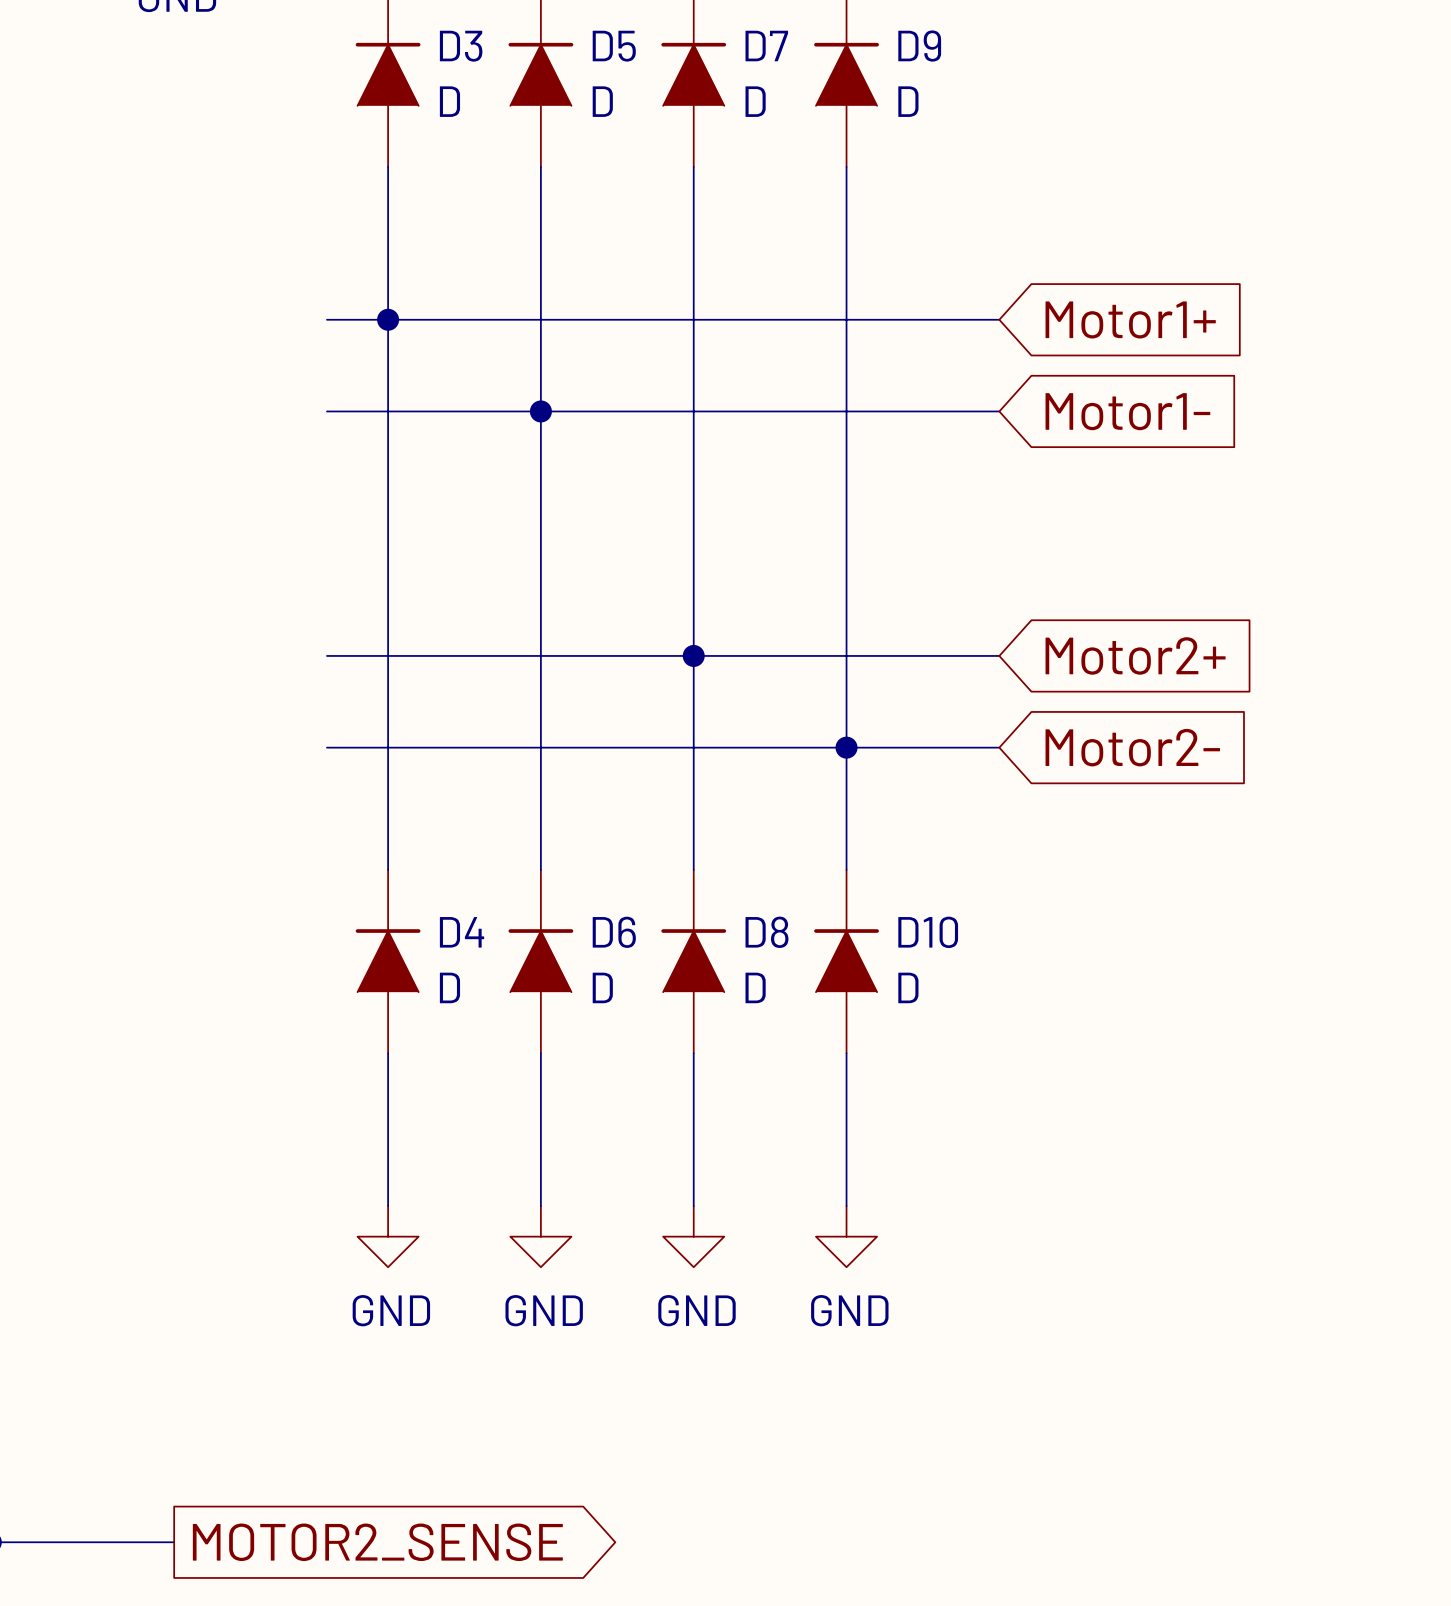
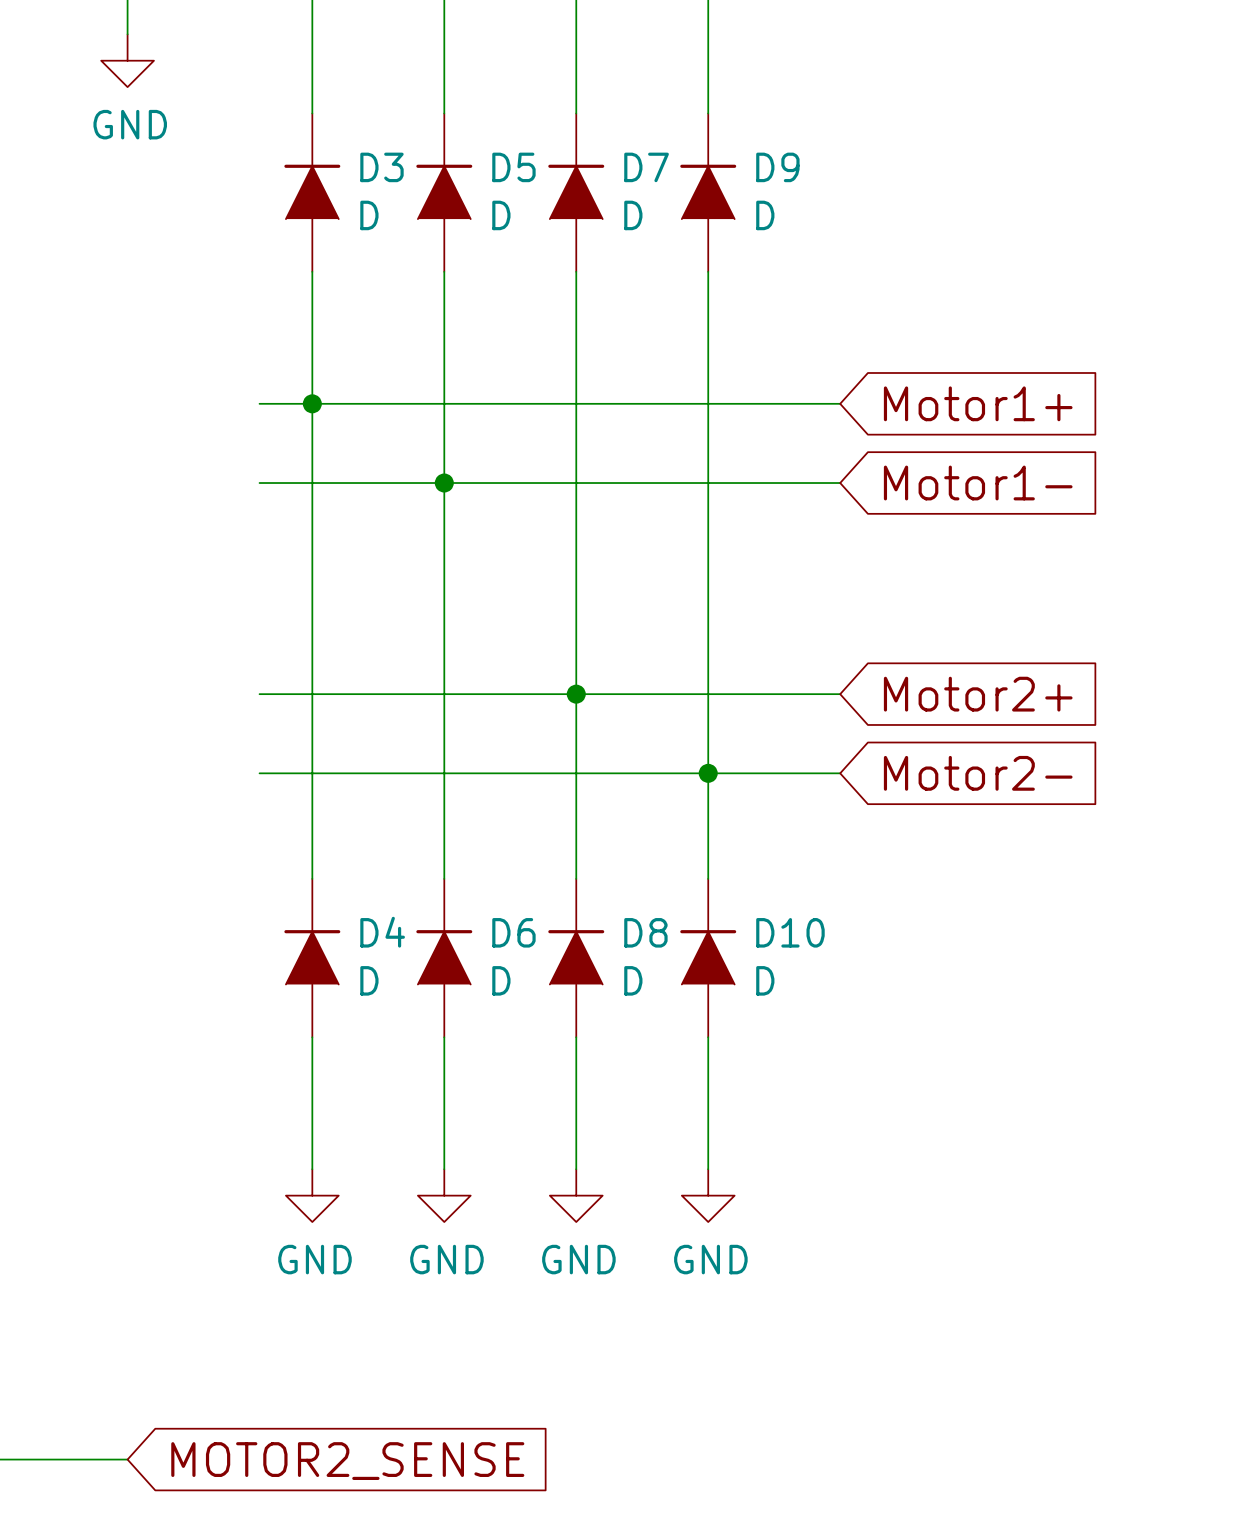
global label shape: output (377, 1542) -> input (347, 1461)

